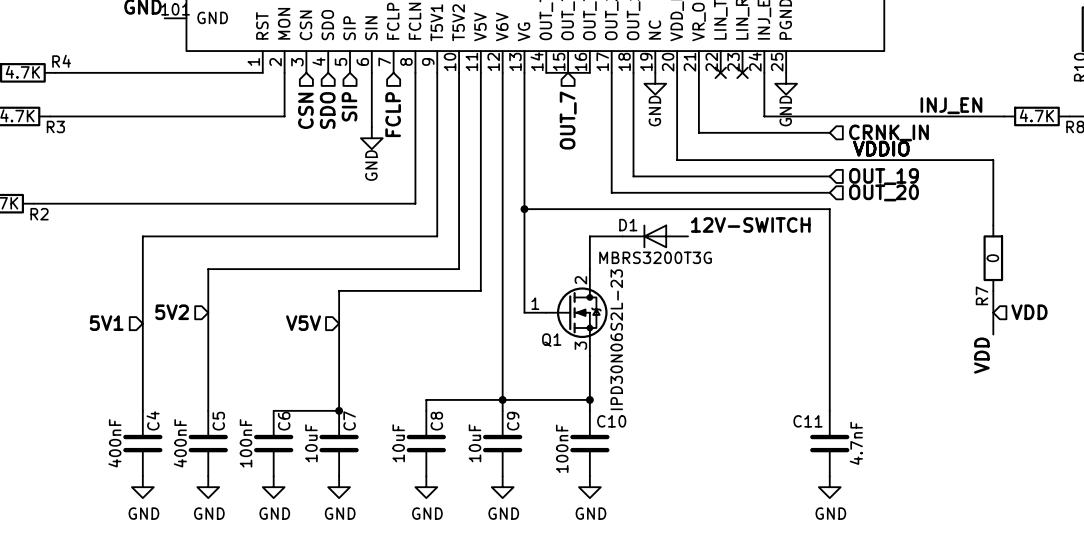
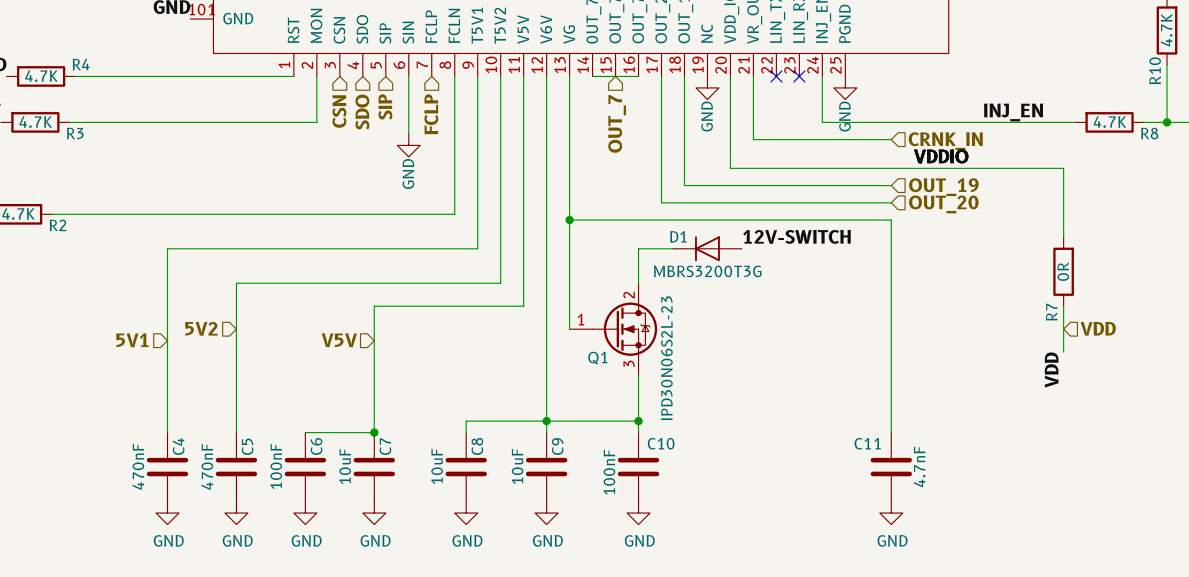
R7 value: 0 (992, 258) -> 0R (1063, 271)
C4 value: 400nF (114, 443) -> 470nF (138, 466)
C5 value: 400nF (180, 443) -> 470nF (207, 466)

